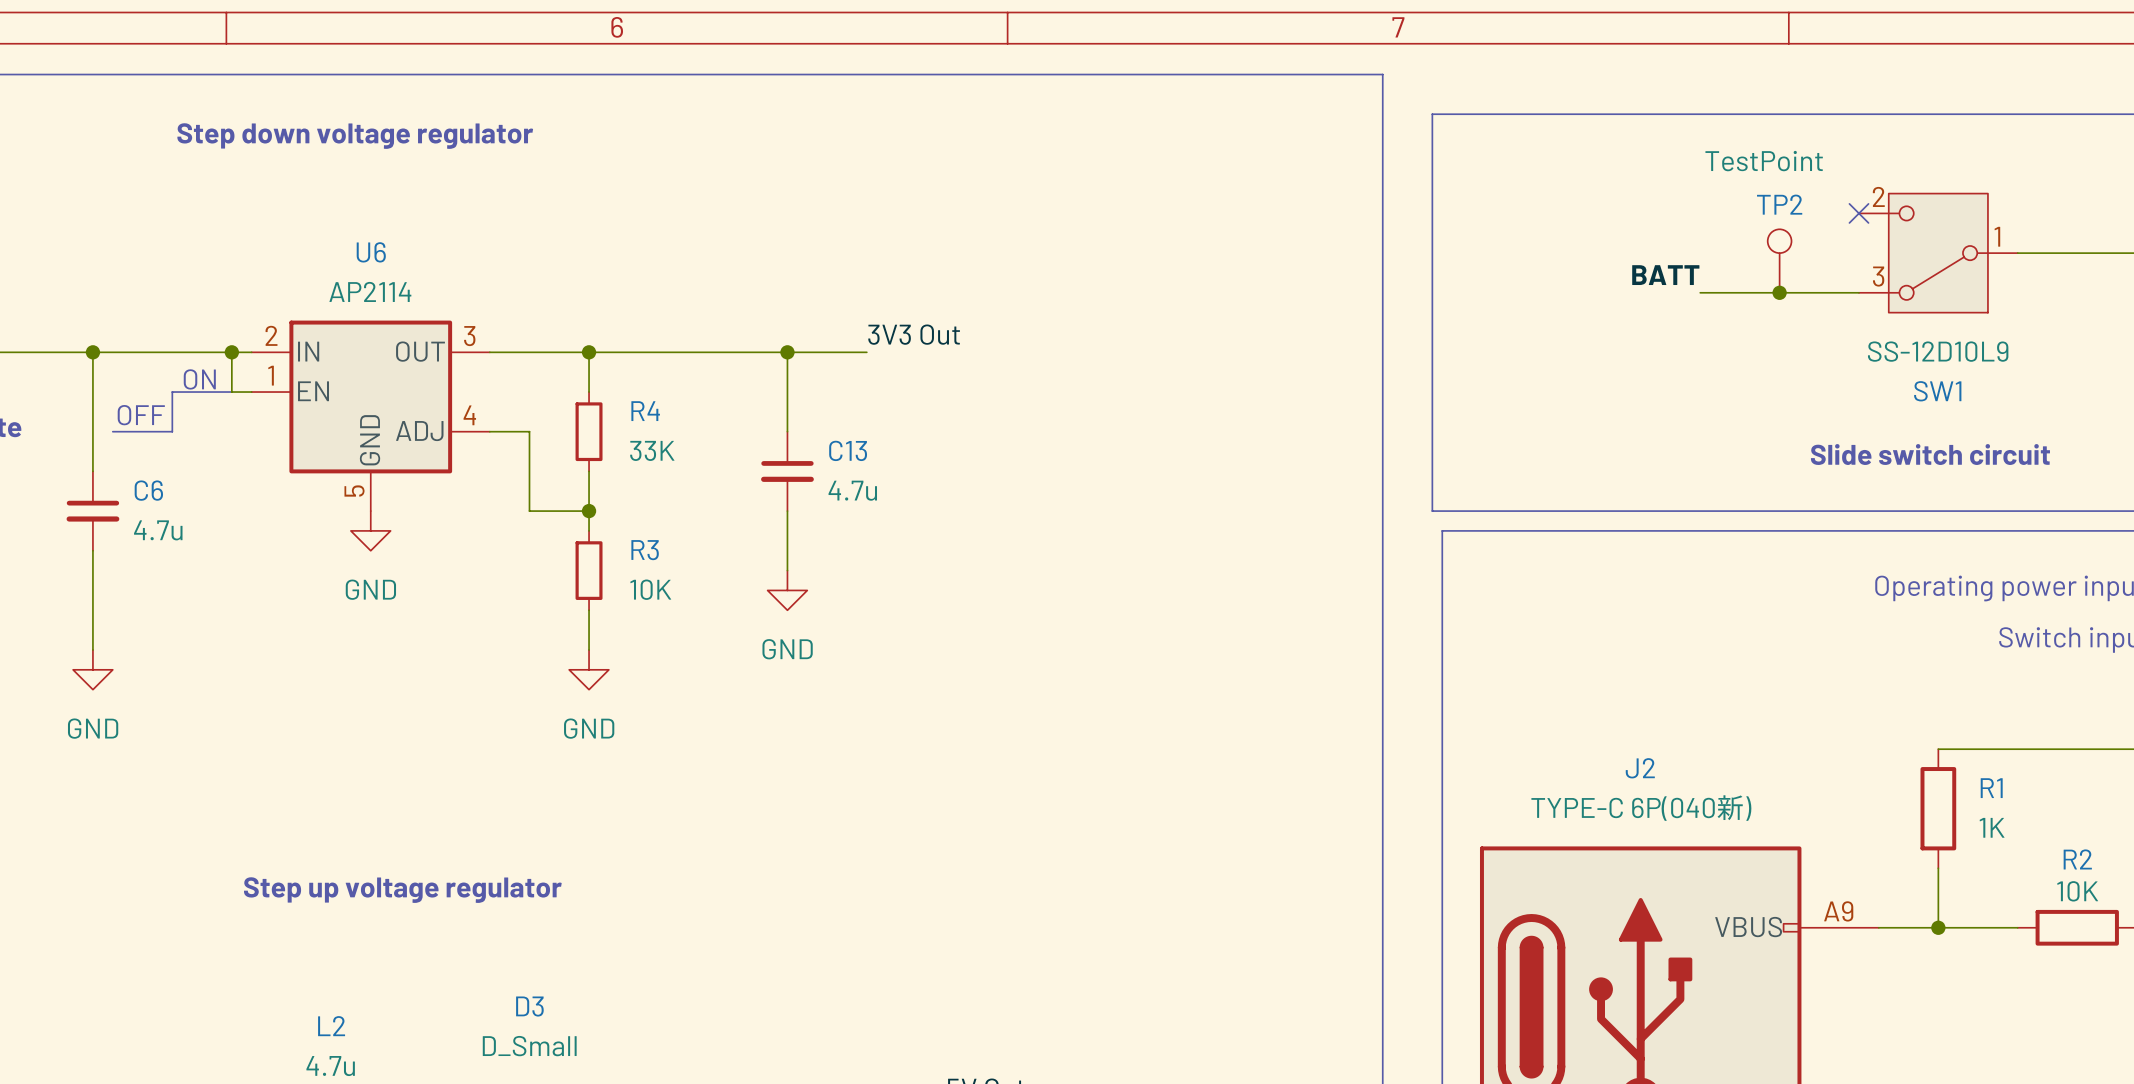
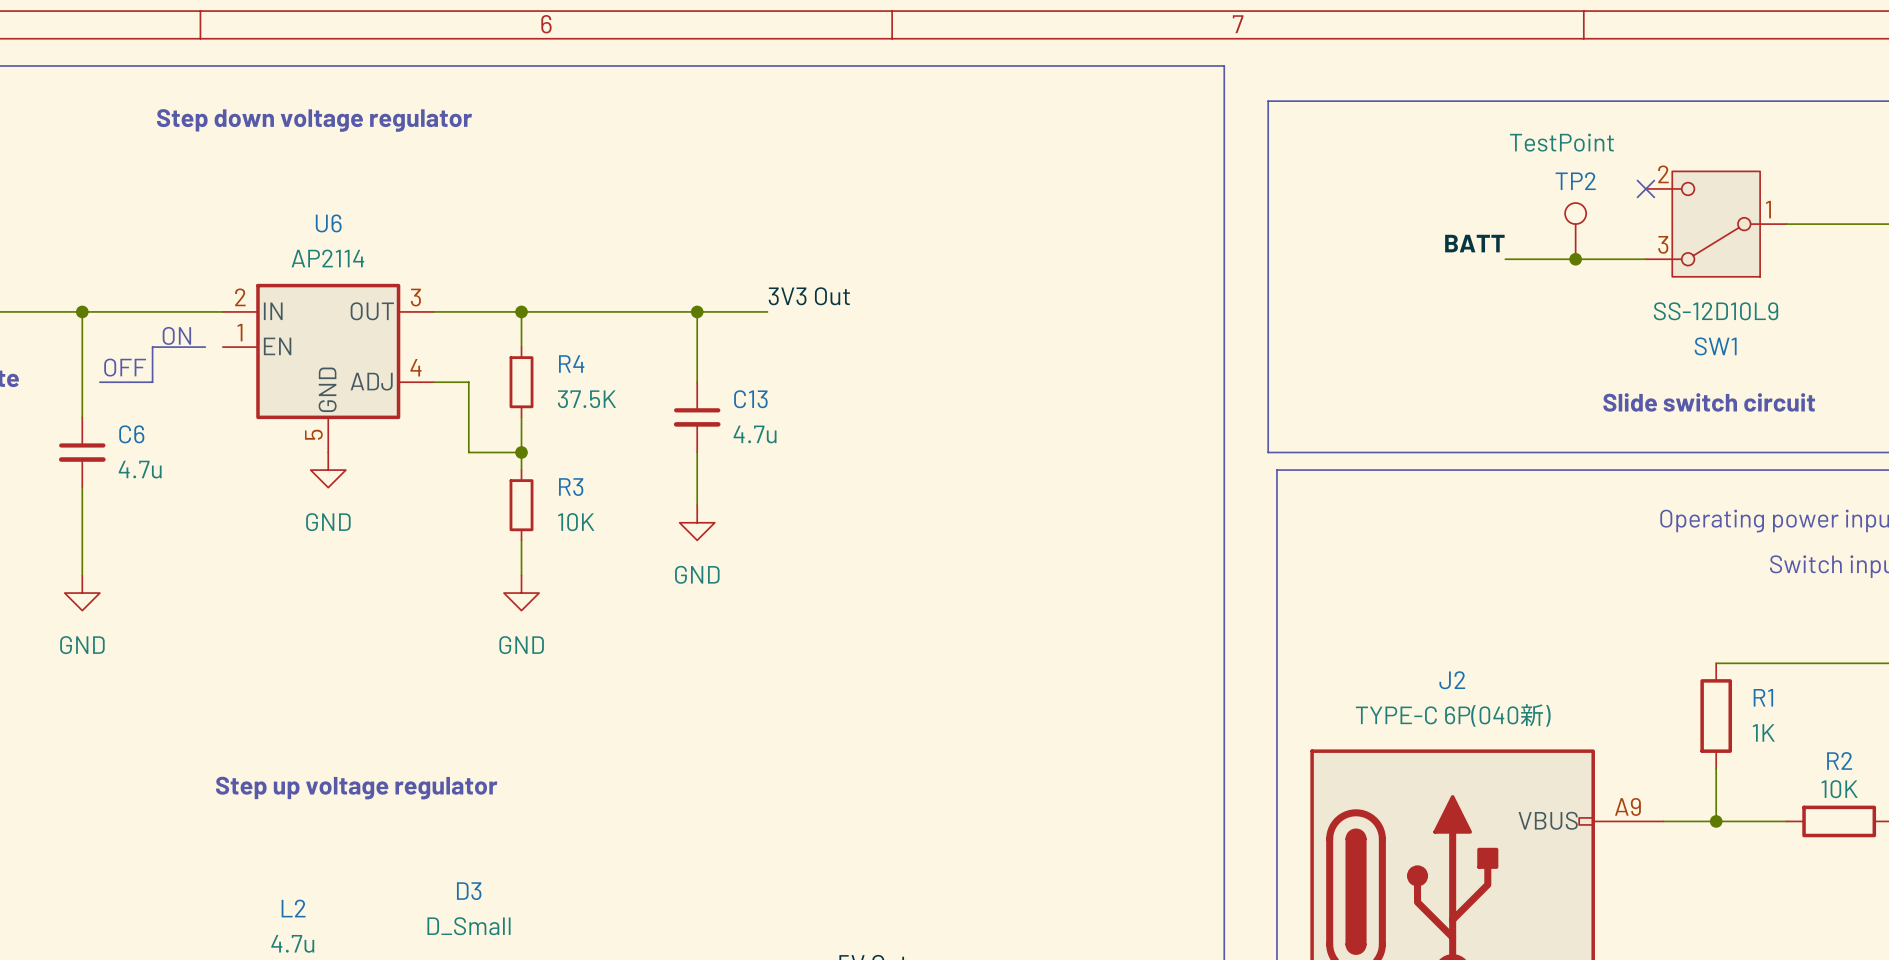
wire: (231, 352) (231, 392) (251, 392) -> none
junction: (231, 352) -> none
R4 value: 33K (652, 450) -> 37.5K (586, 399)

